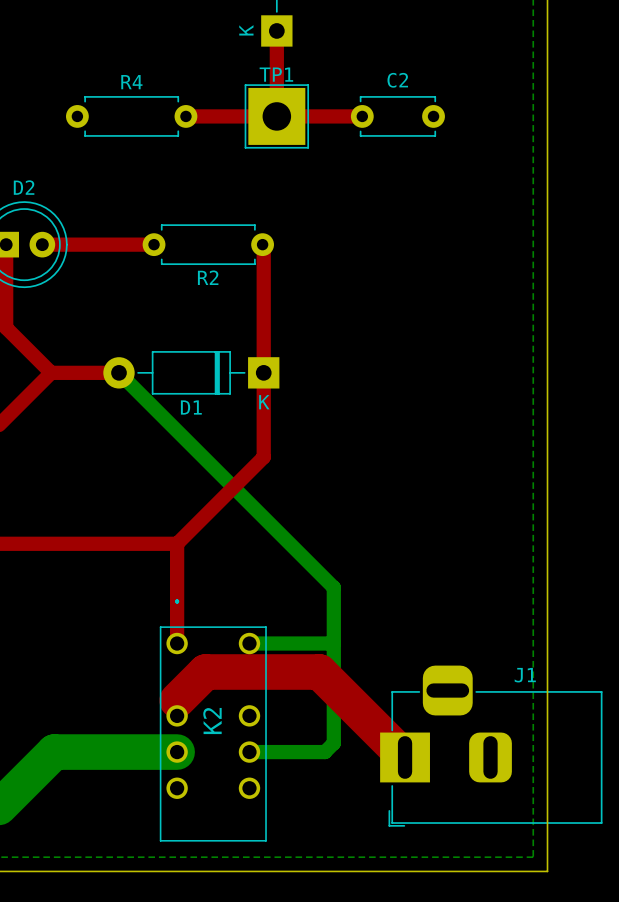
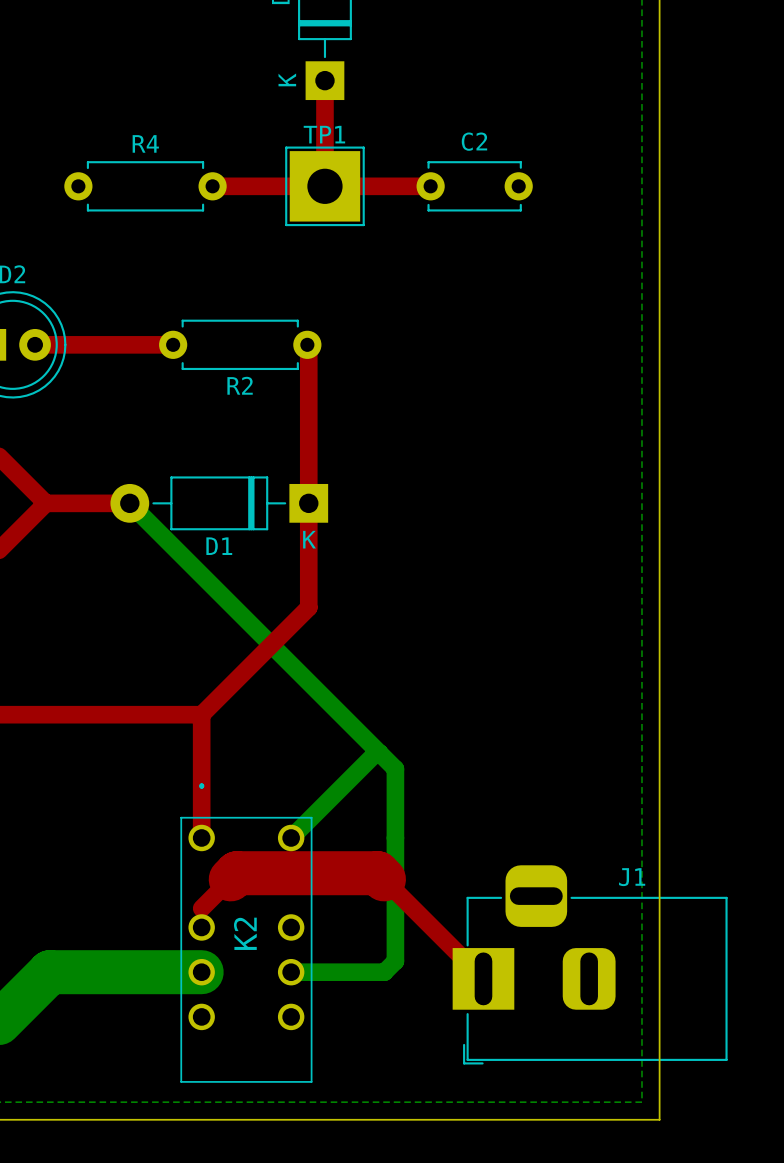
bottom track: (249, 643) (333, 643) -> (291, 837) (376, 753) (379, 753)
top track width: thick (200, 676) (177, 700) -> thin (230, 879) (201, 908)
top track width: thick (324, 676) (405, 757) -> thin (383, 879) (483, 978)

